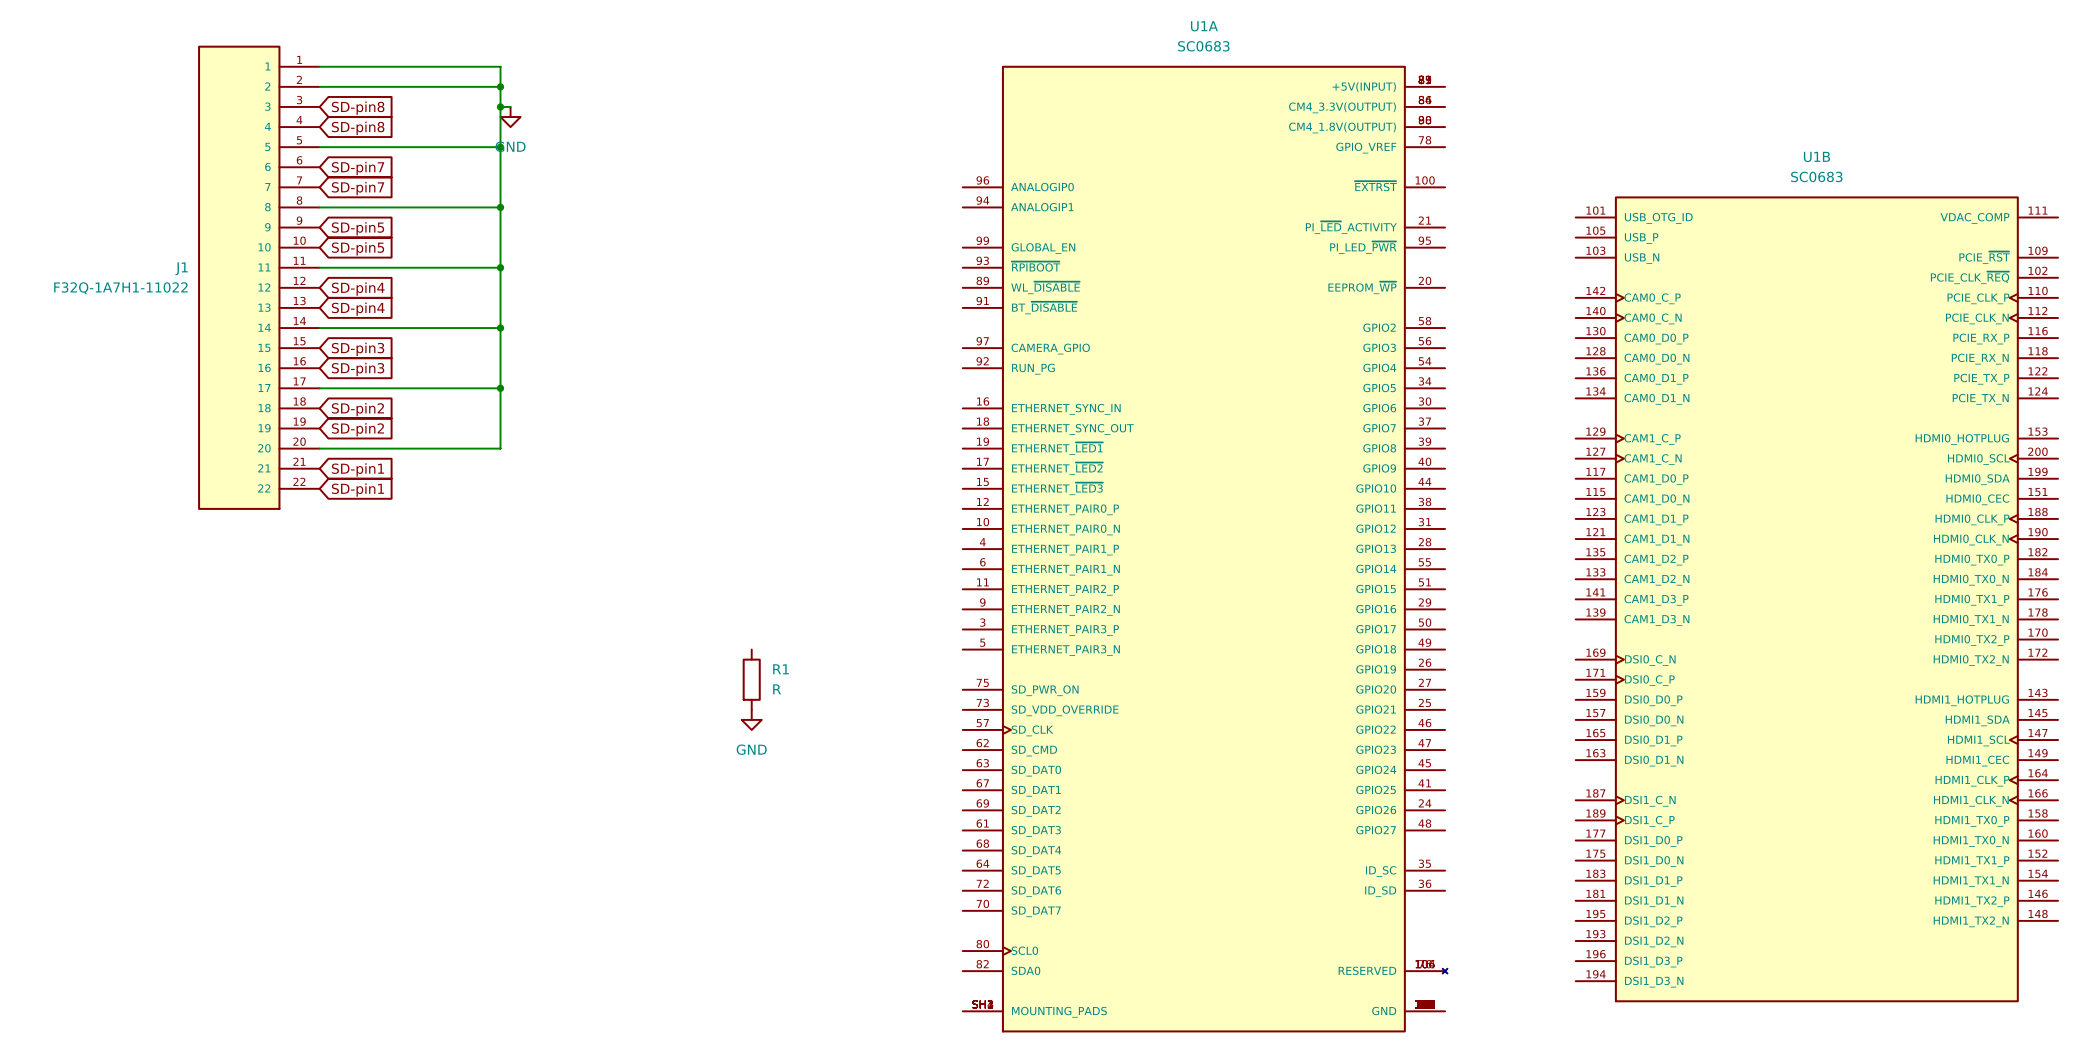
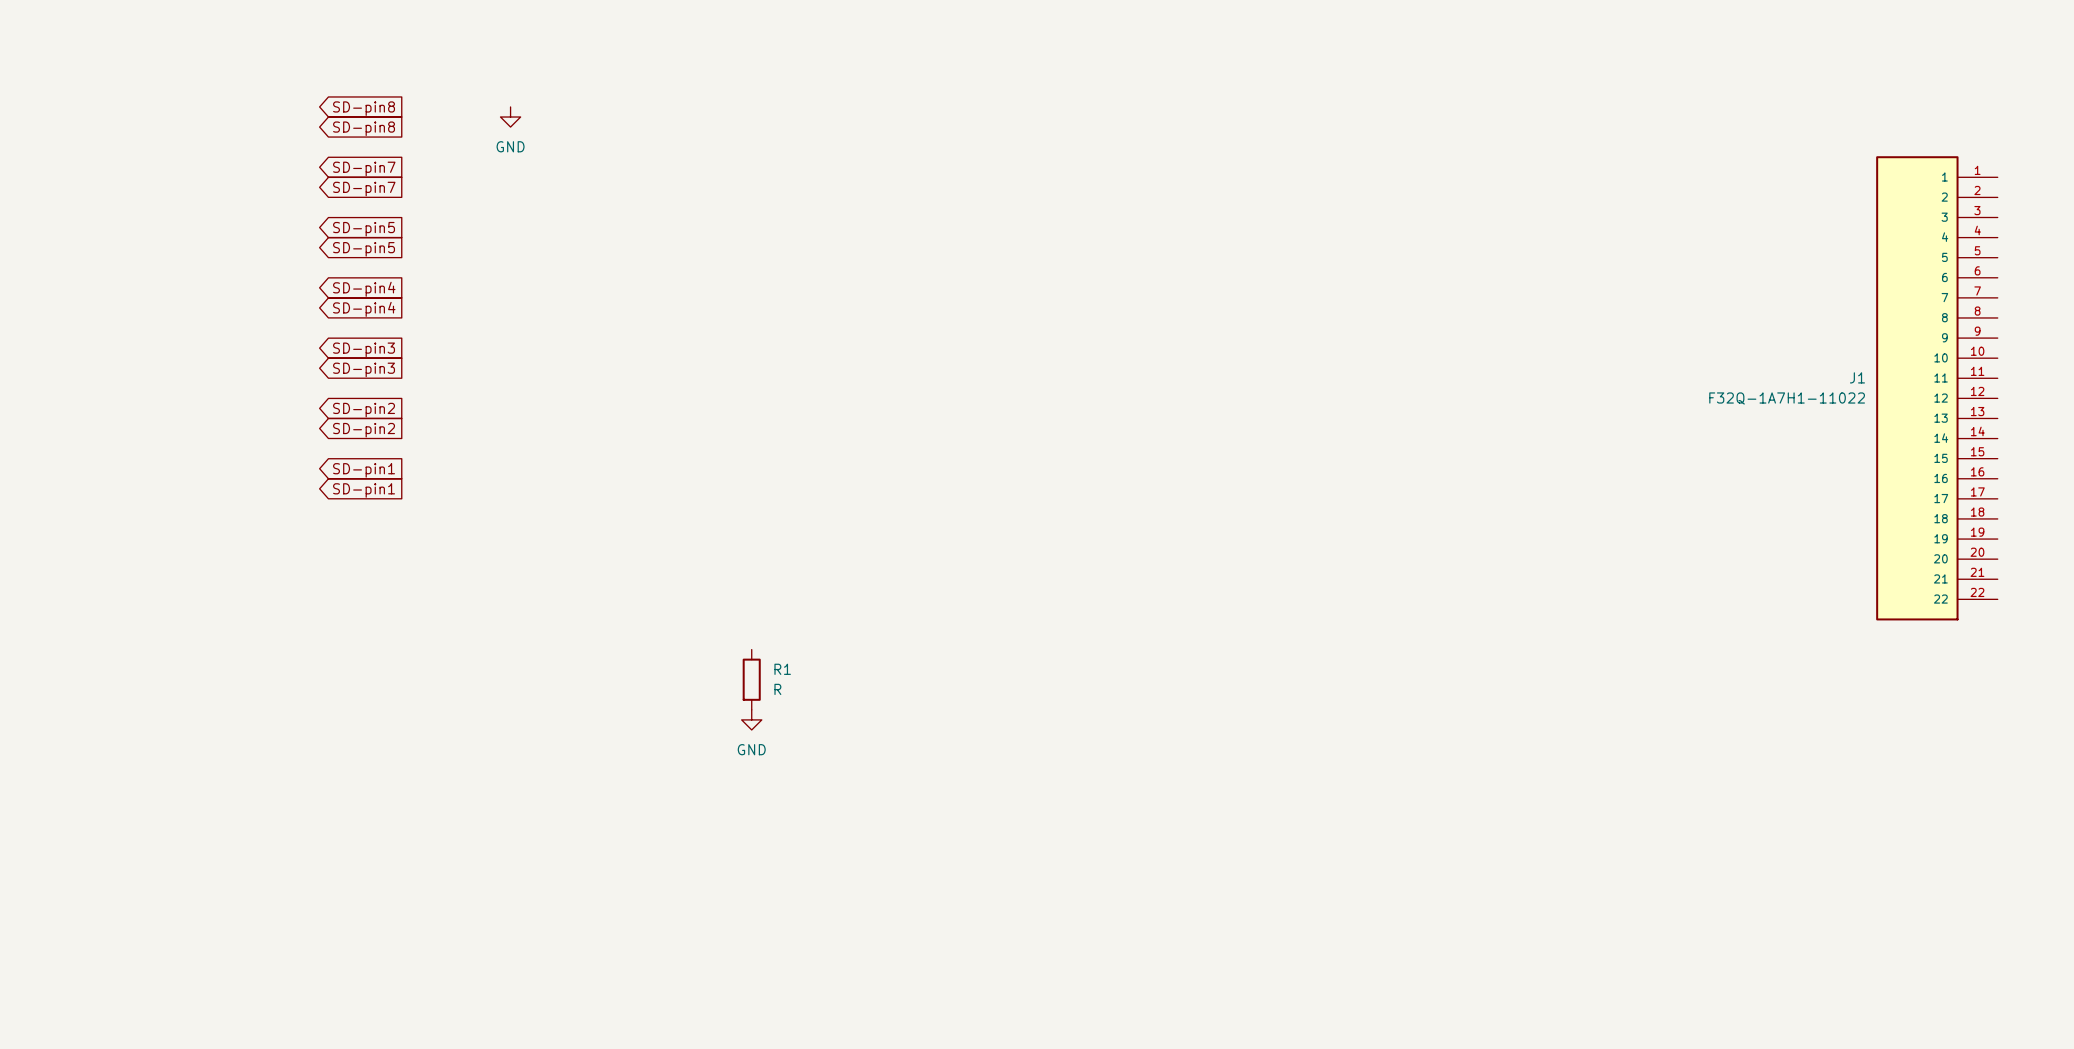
wire: (319, 66) (500, 66) (500, 448) (319, 448) -> none
wire: (319, 86) (500, 86) -> none
junction: (500, 86) -> none
wire: (500, 106) (510, 106) -> none
junction: (500, 106) -> none
wire: (319, 147) (500, 147) -> none
junction: (500, 147) -> none
wire: (319, 207) (500, 207) -> none
junction: (500, 207) -> none
wire: (319, 267) (500, 267) -> none
junction: (500, 267) -> none
J1 position: (258, 277) -> (1936, 388)
wire: (319, 328) (500, 328) -> none
junction: (500, 328) -> none
wire: (319, 388) (500, 388) -> none
junction: (500, 388) -> none
U1A: SC0683 (1205, 549) -> none
U1B: SC0683 (1816, 599) -> none

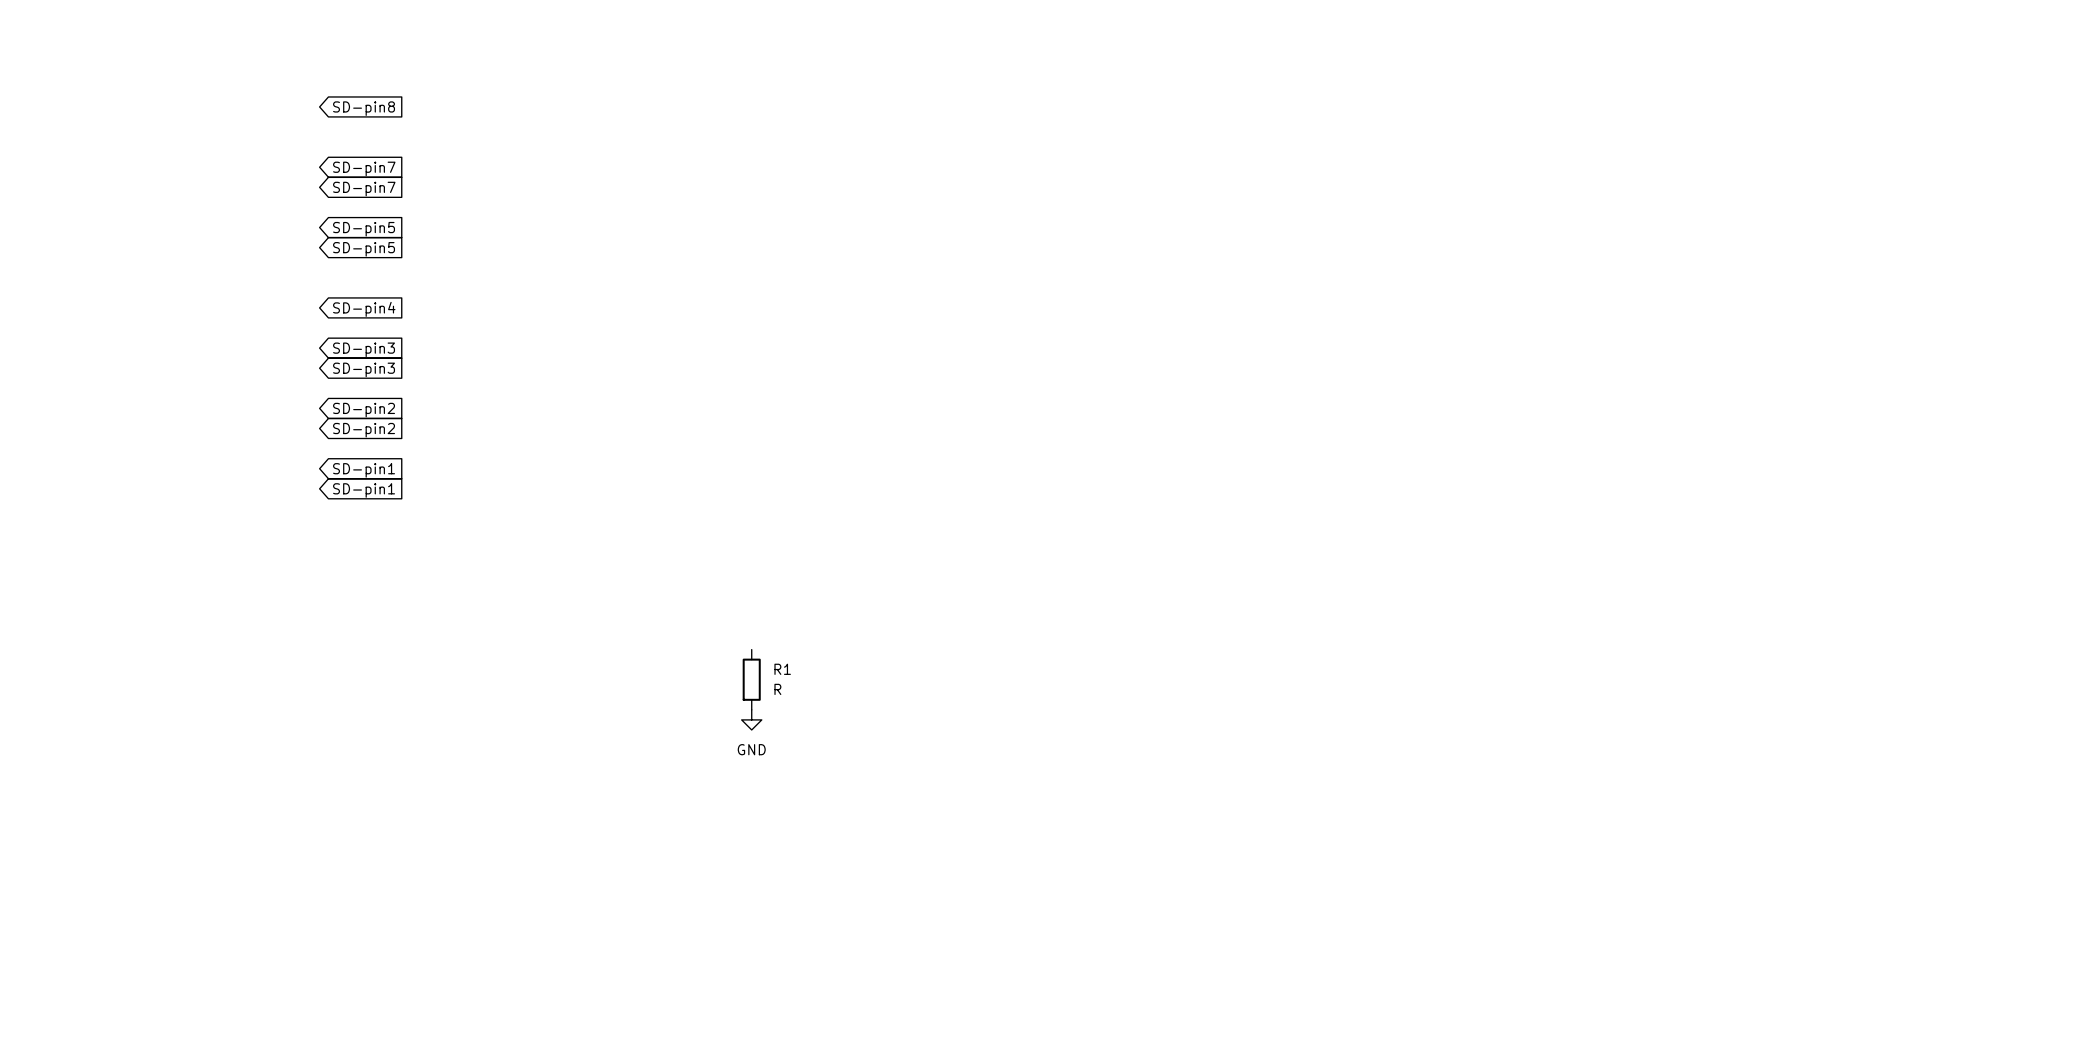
power symbol: GND (510, 117) -> none
global label: SD-pin8 (364, 128) -> none
global label: SD-pin4 (364, 289) -> none
J1: F32Q-1A7H1-11022 (1936, 388) -> none

